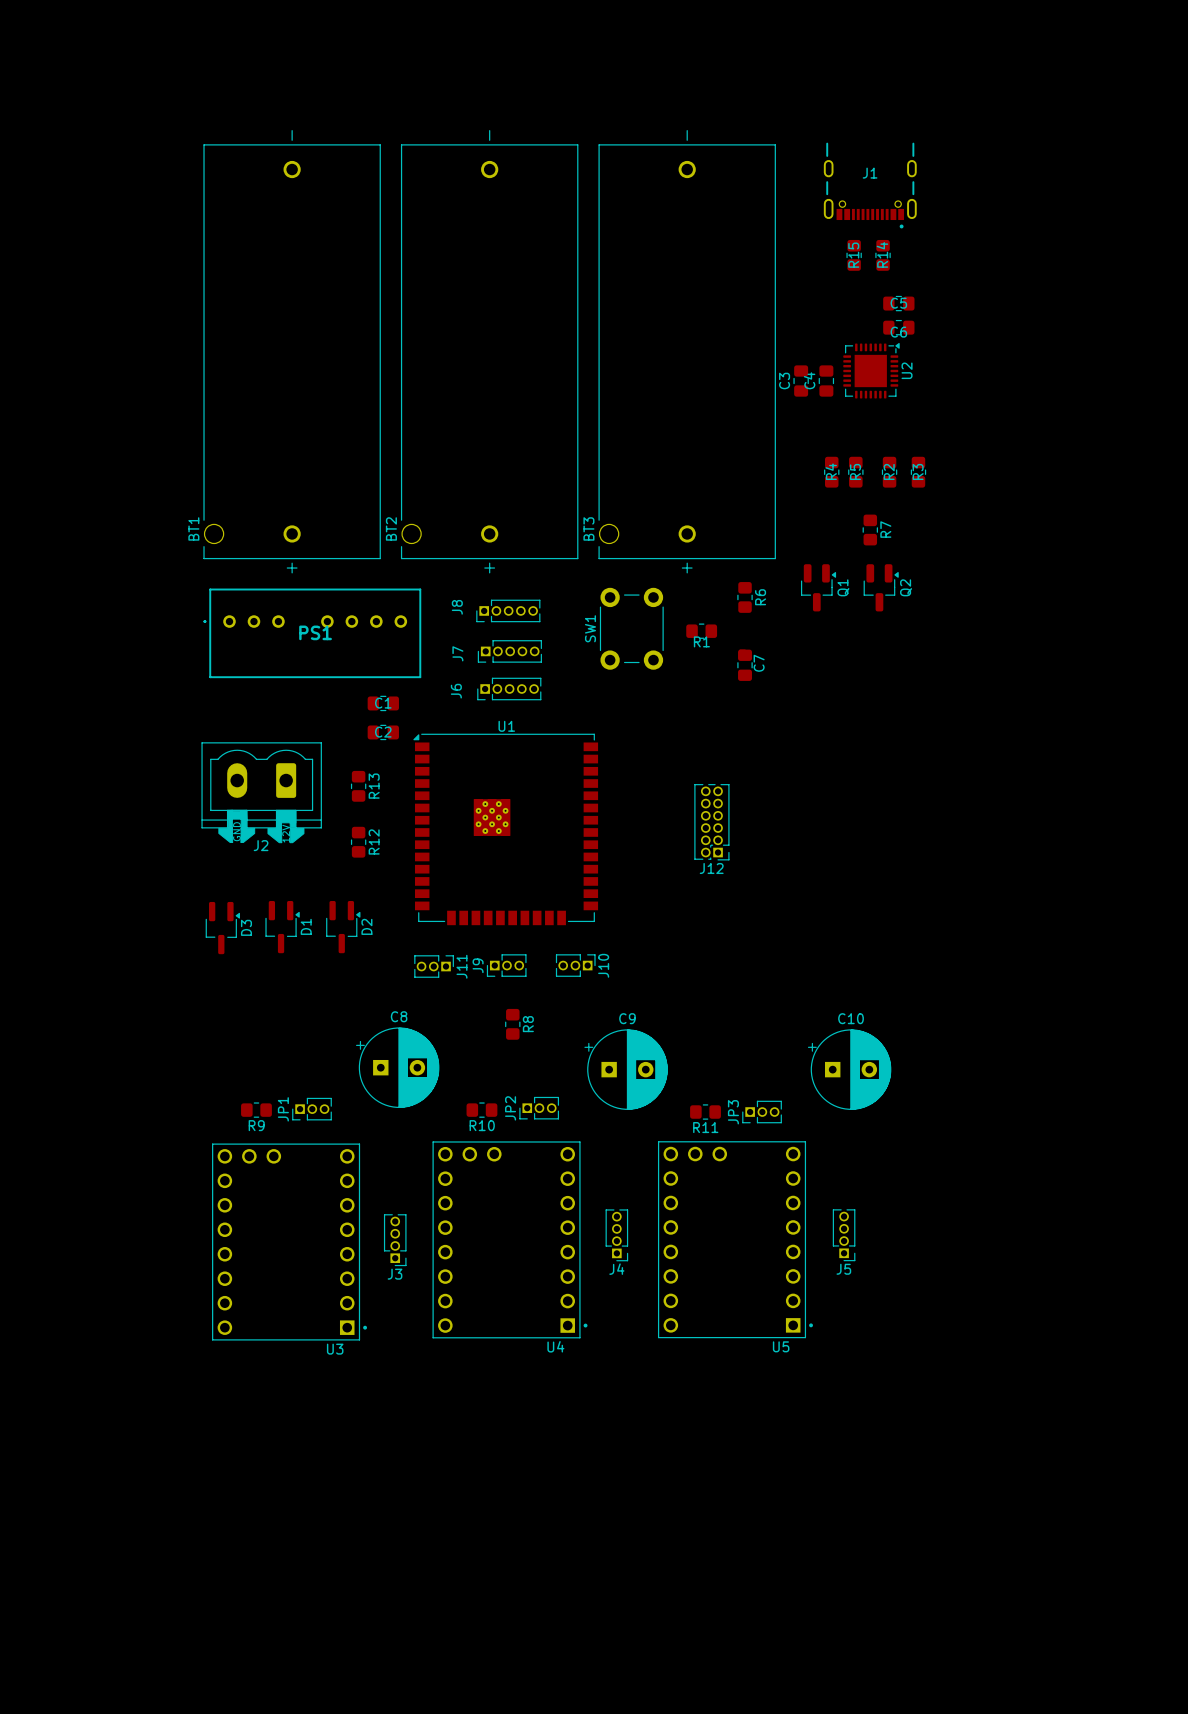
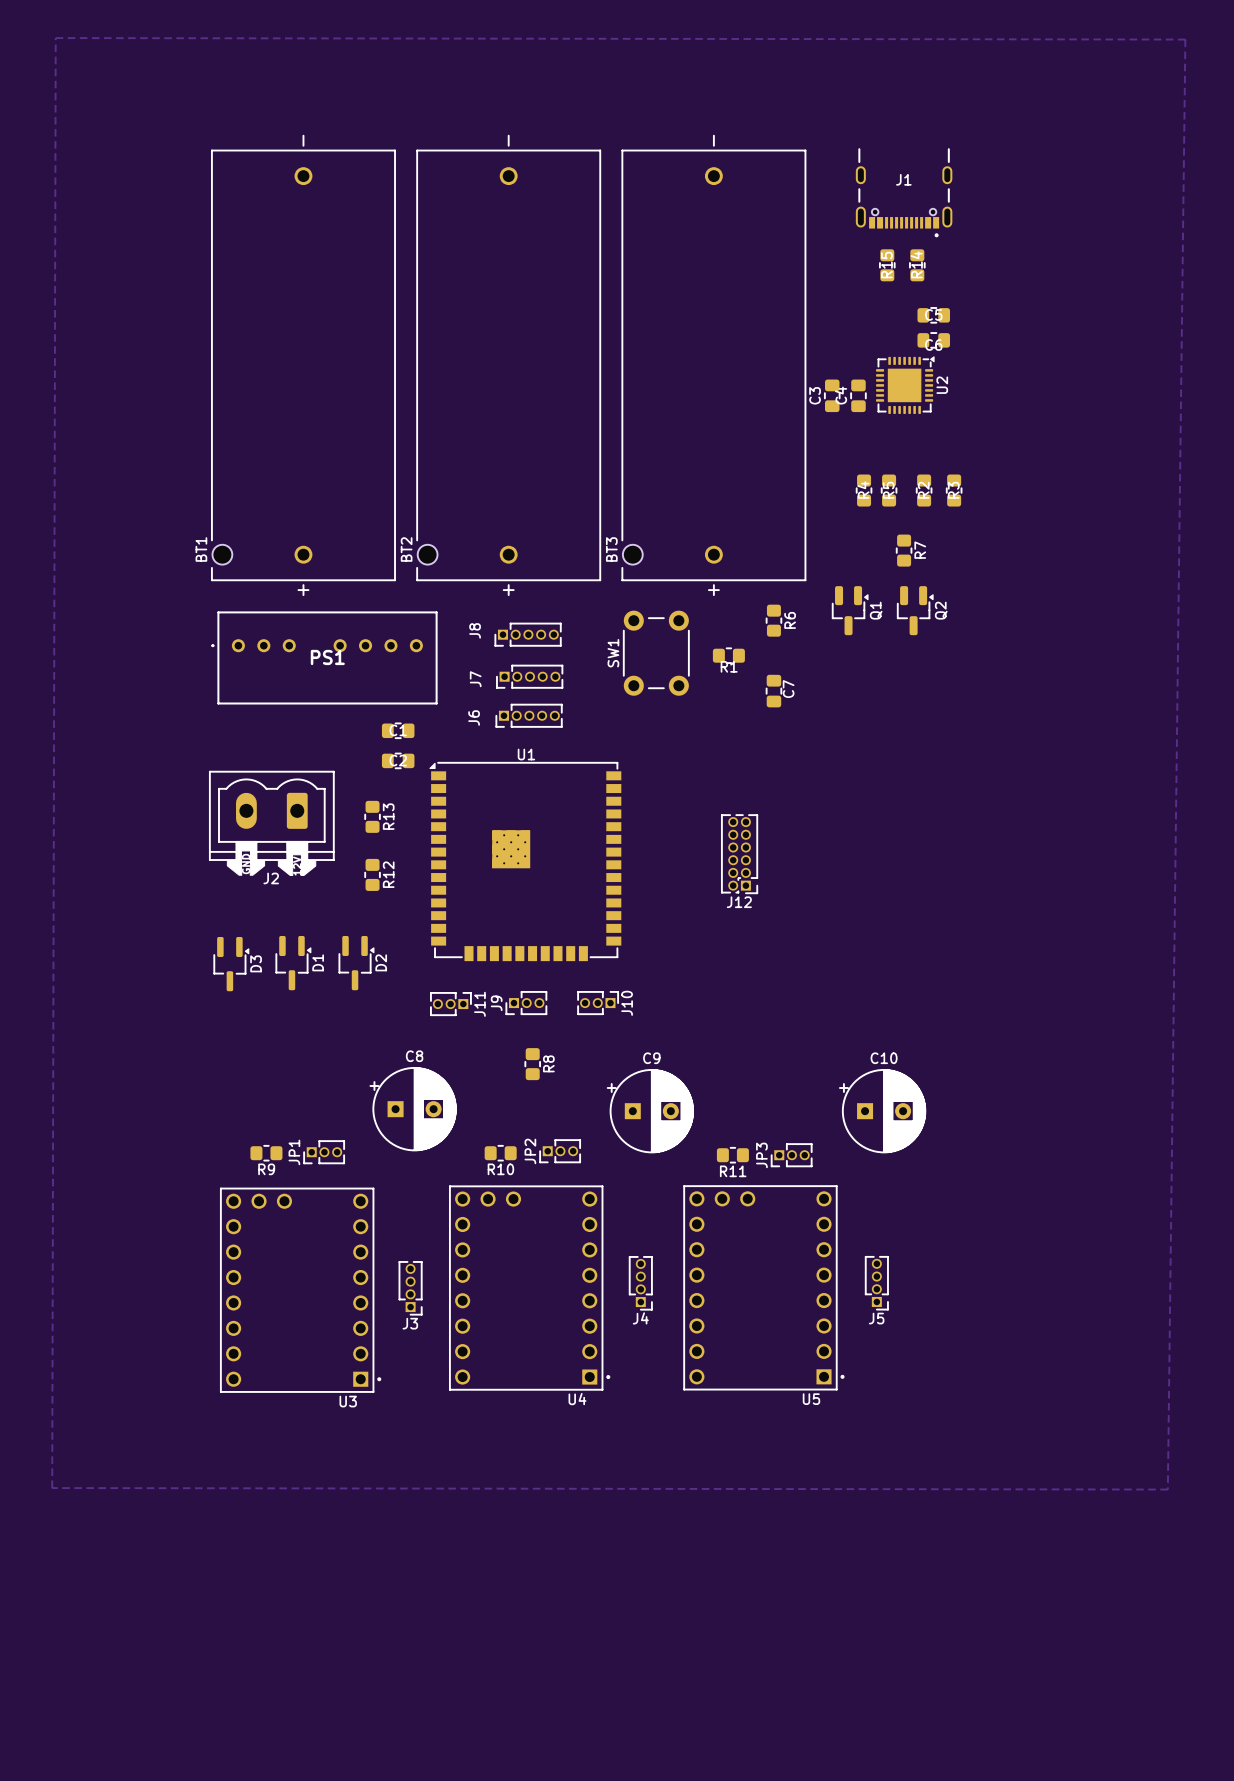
zone outline: none -> (55, 38) (1185, 39) (1167, 1489) (52, 1488) (55, 38)

